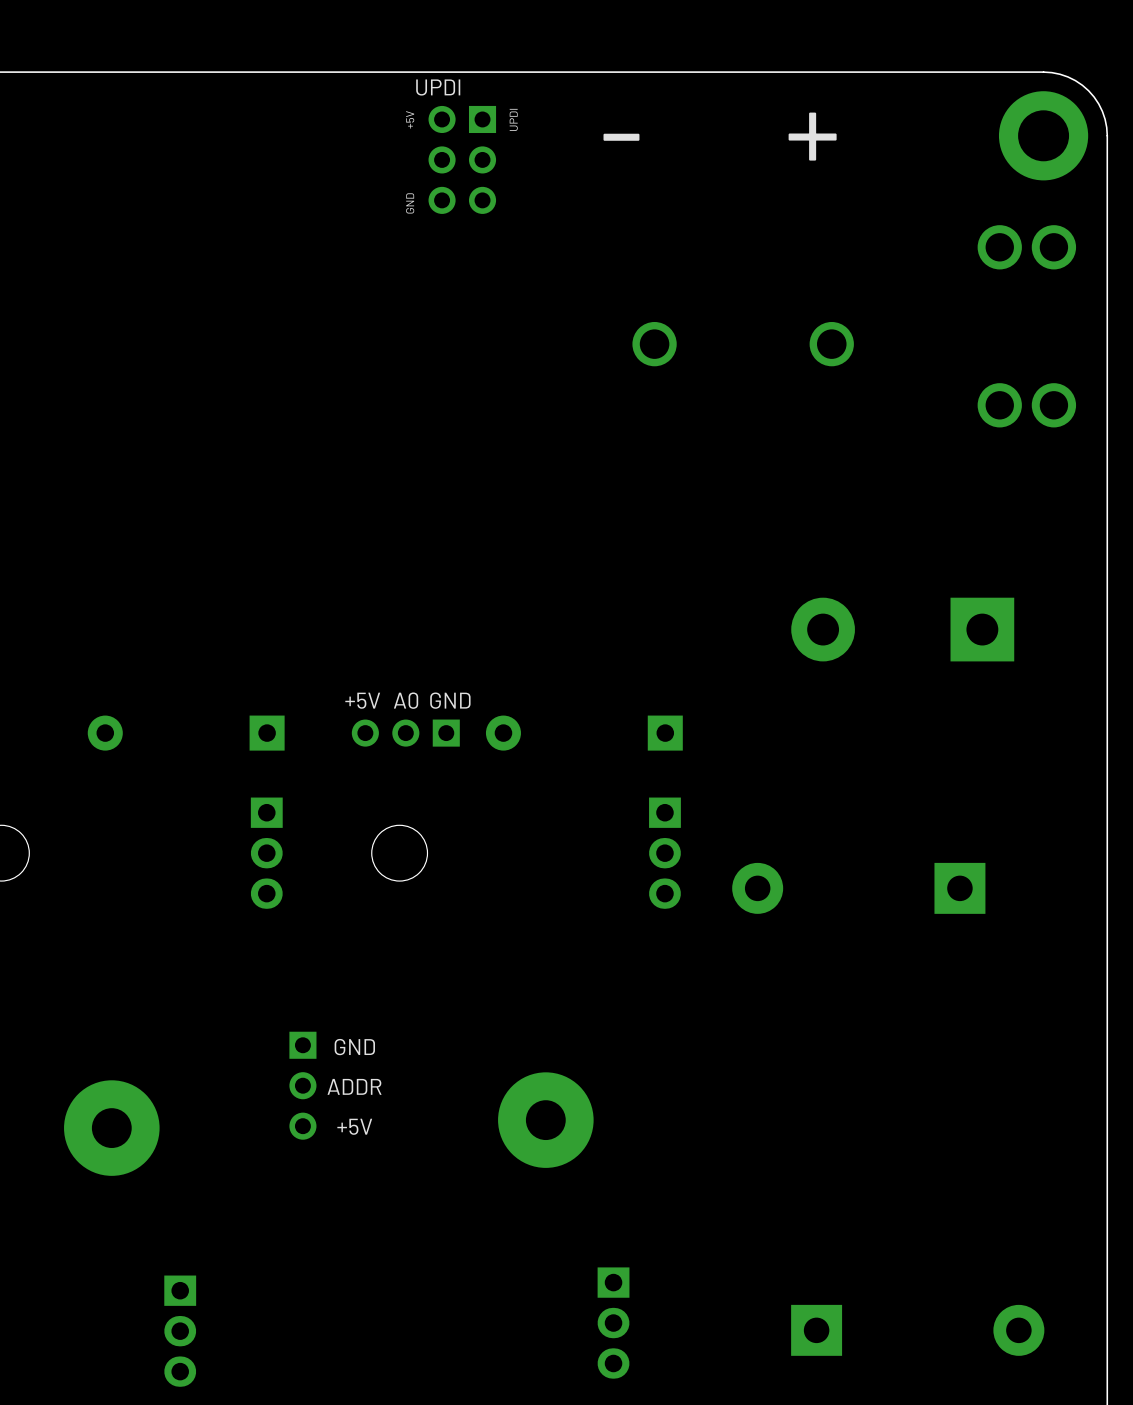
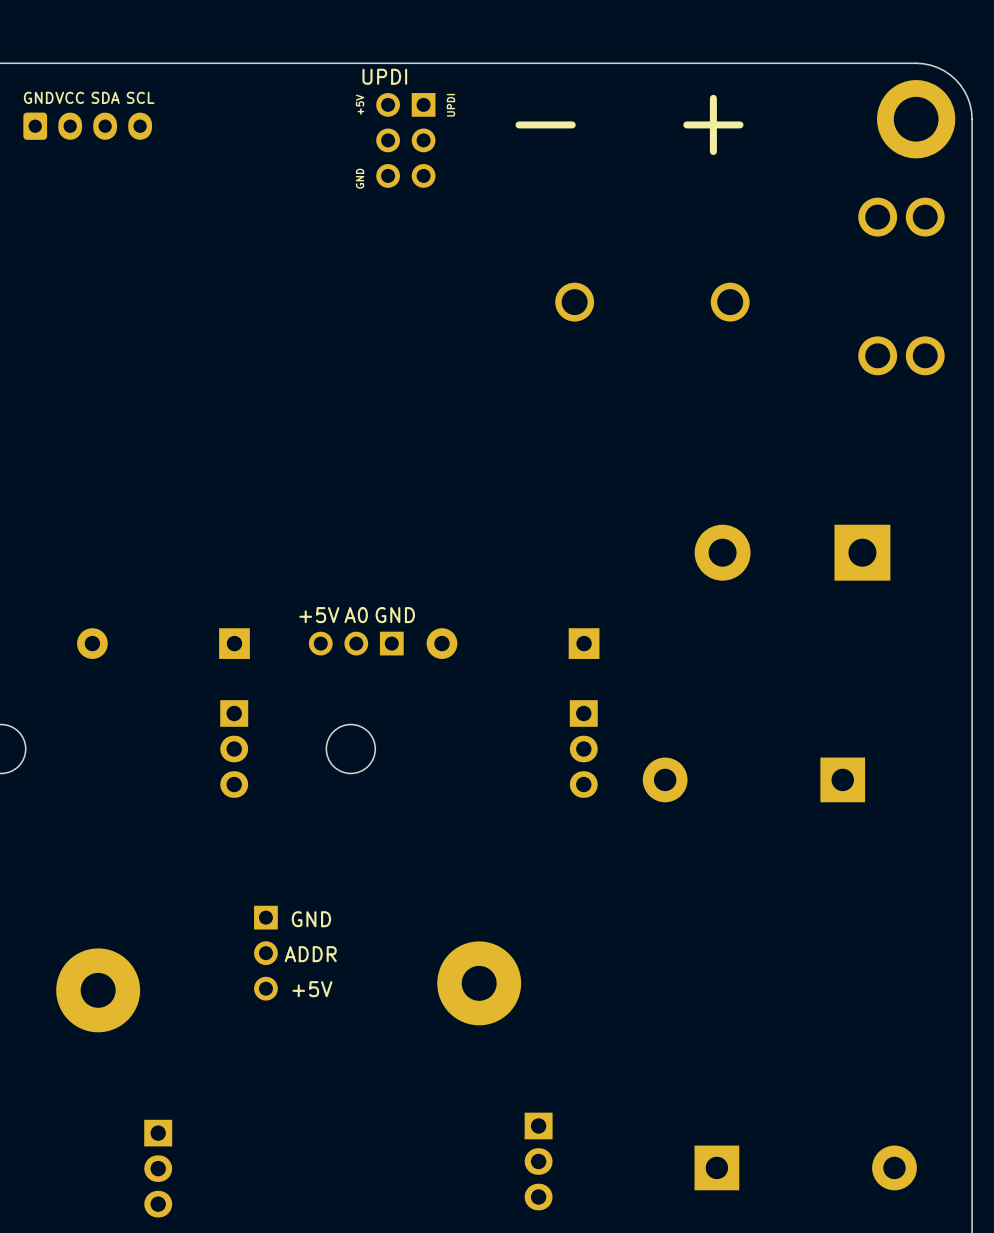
text: none -> GND (38, 97)
text: none -> VCC (69, 97)
text: none -> SDA (105, 97)
text: none -> SCL (140, 97)
part: none -> (87, 126)

